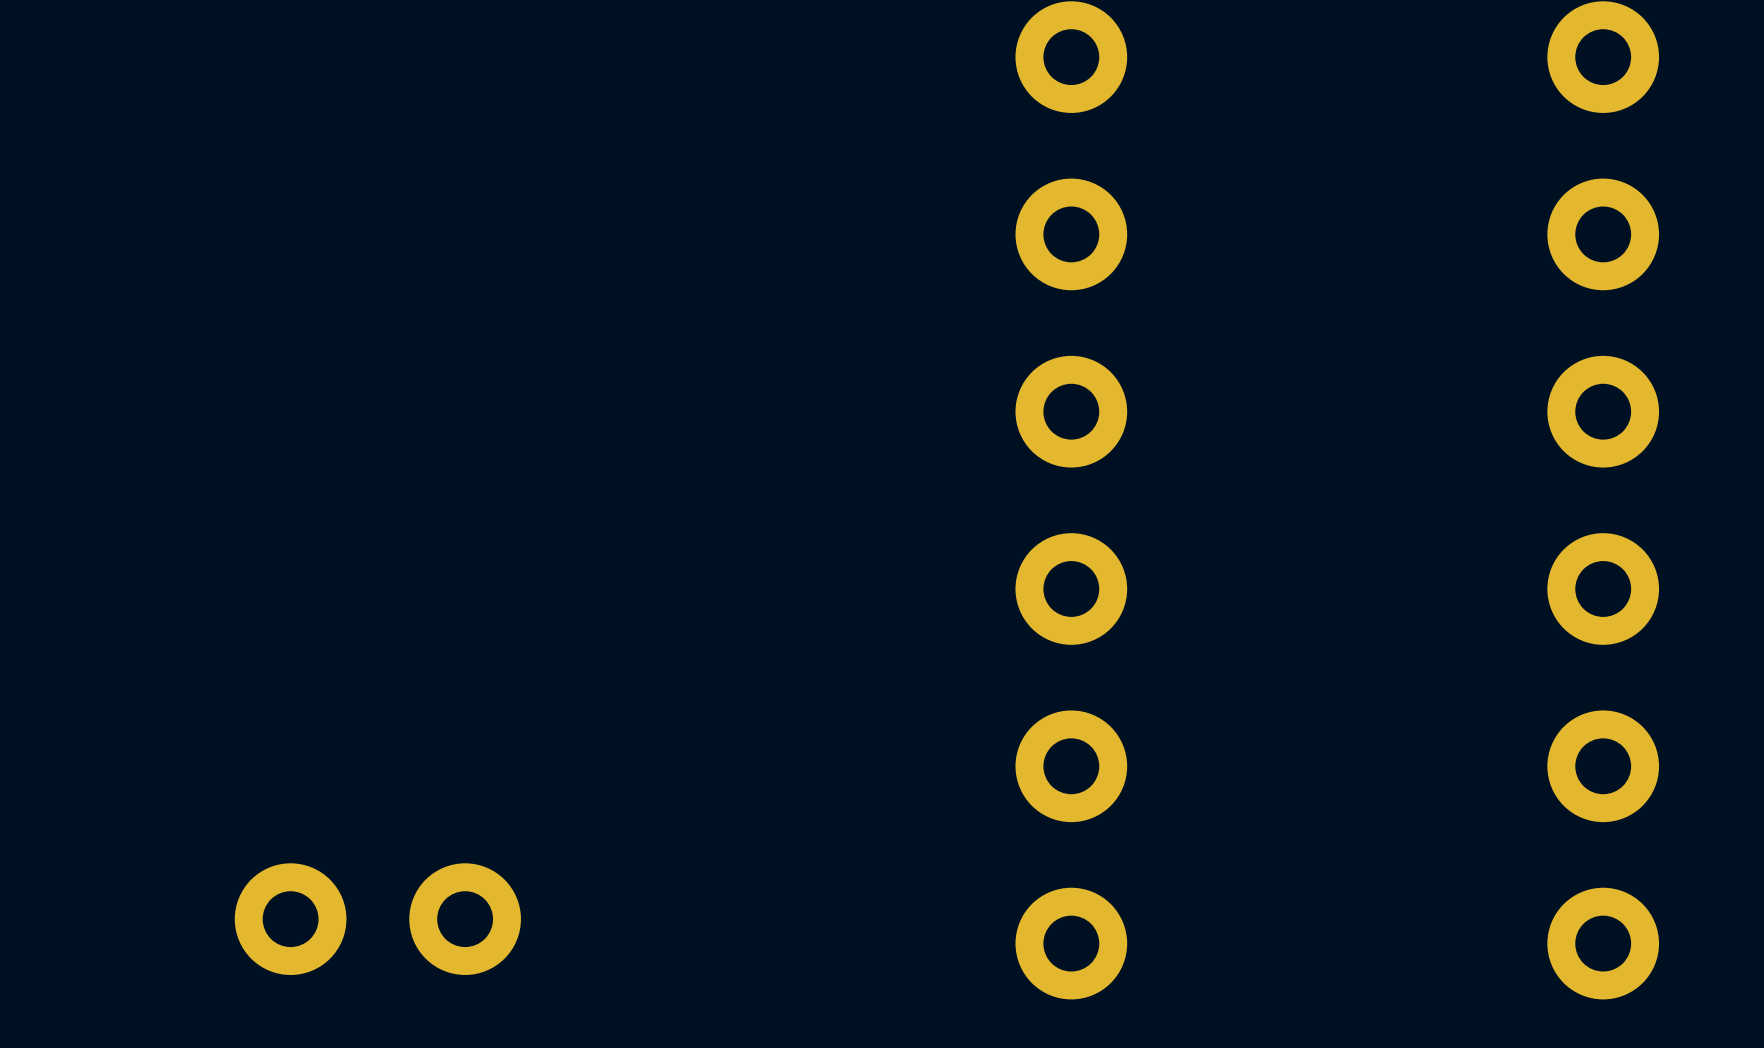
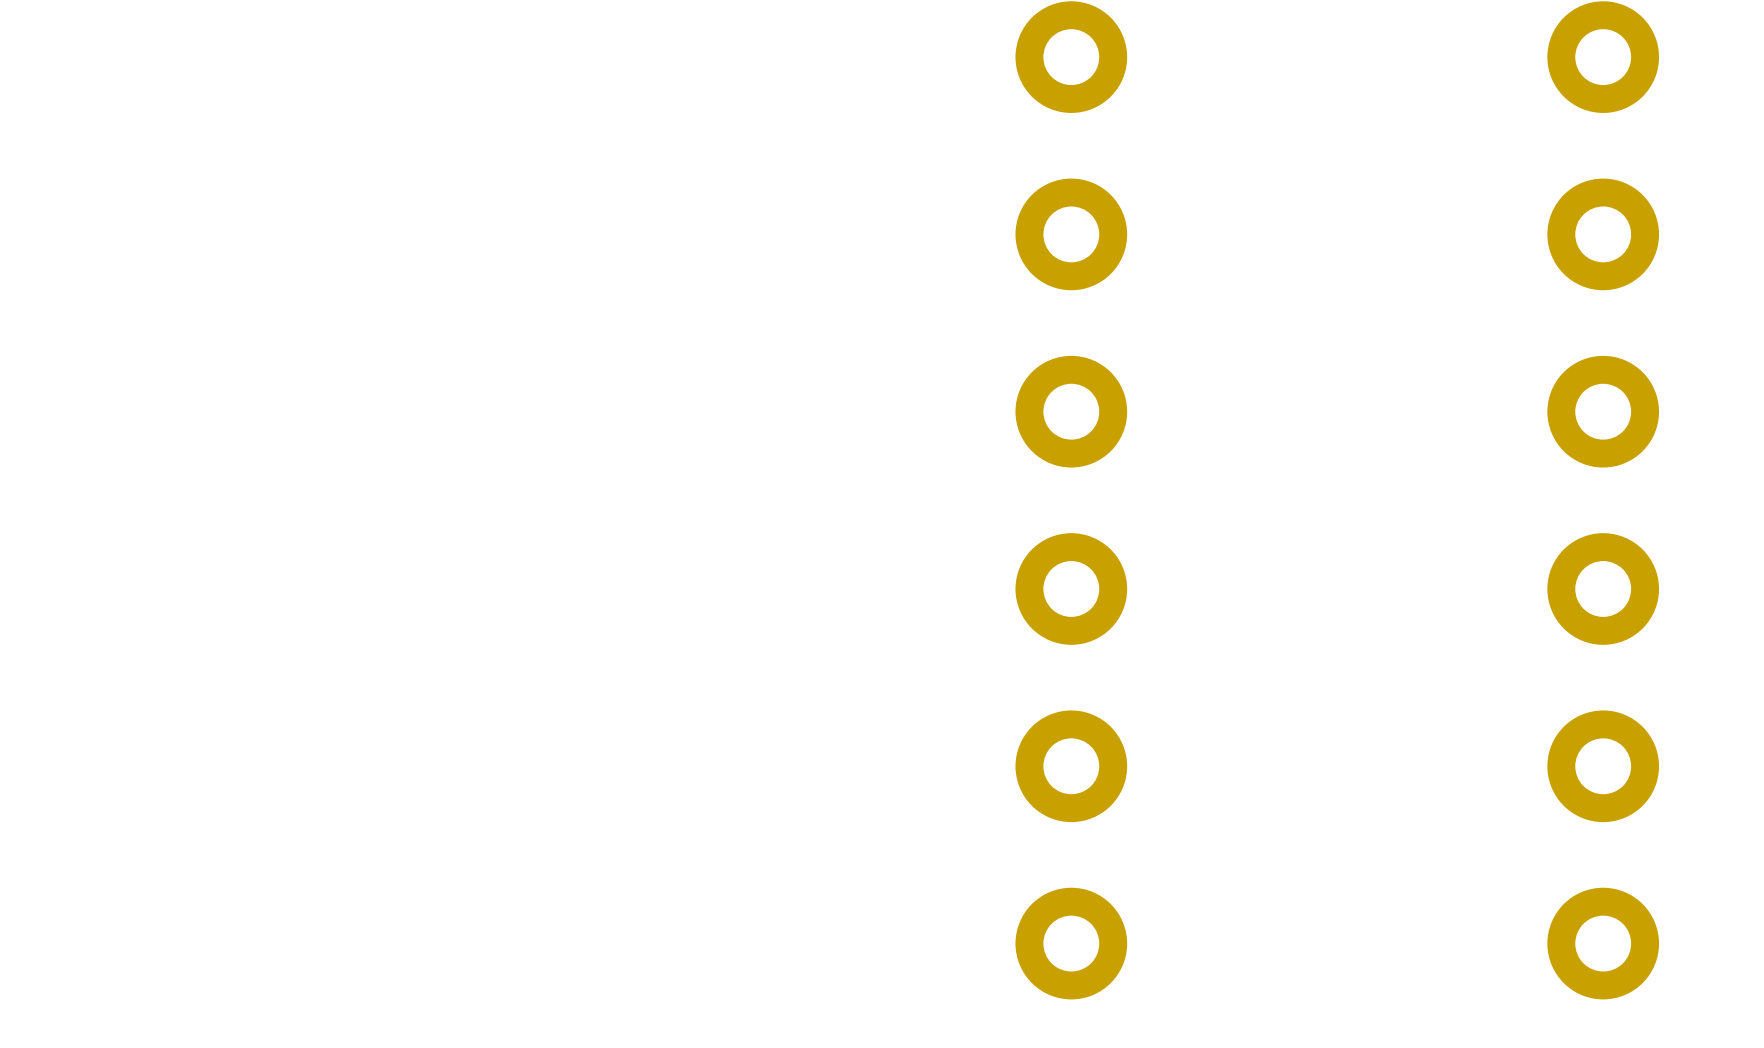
part: (377, 919) -> none

